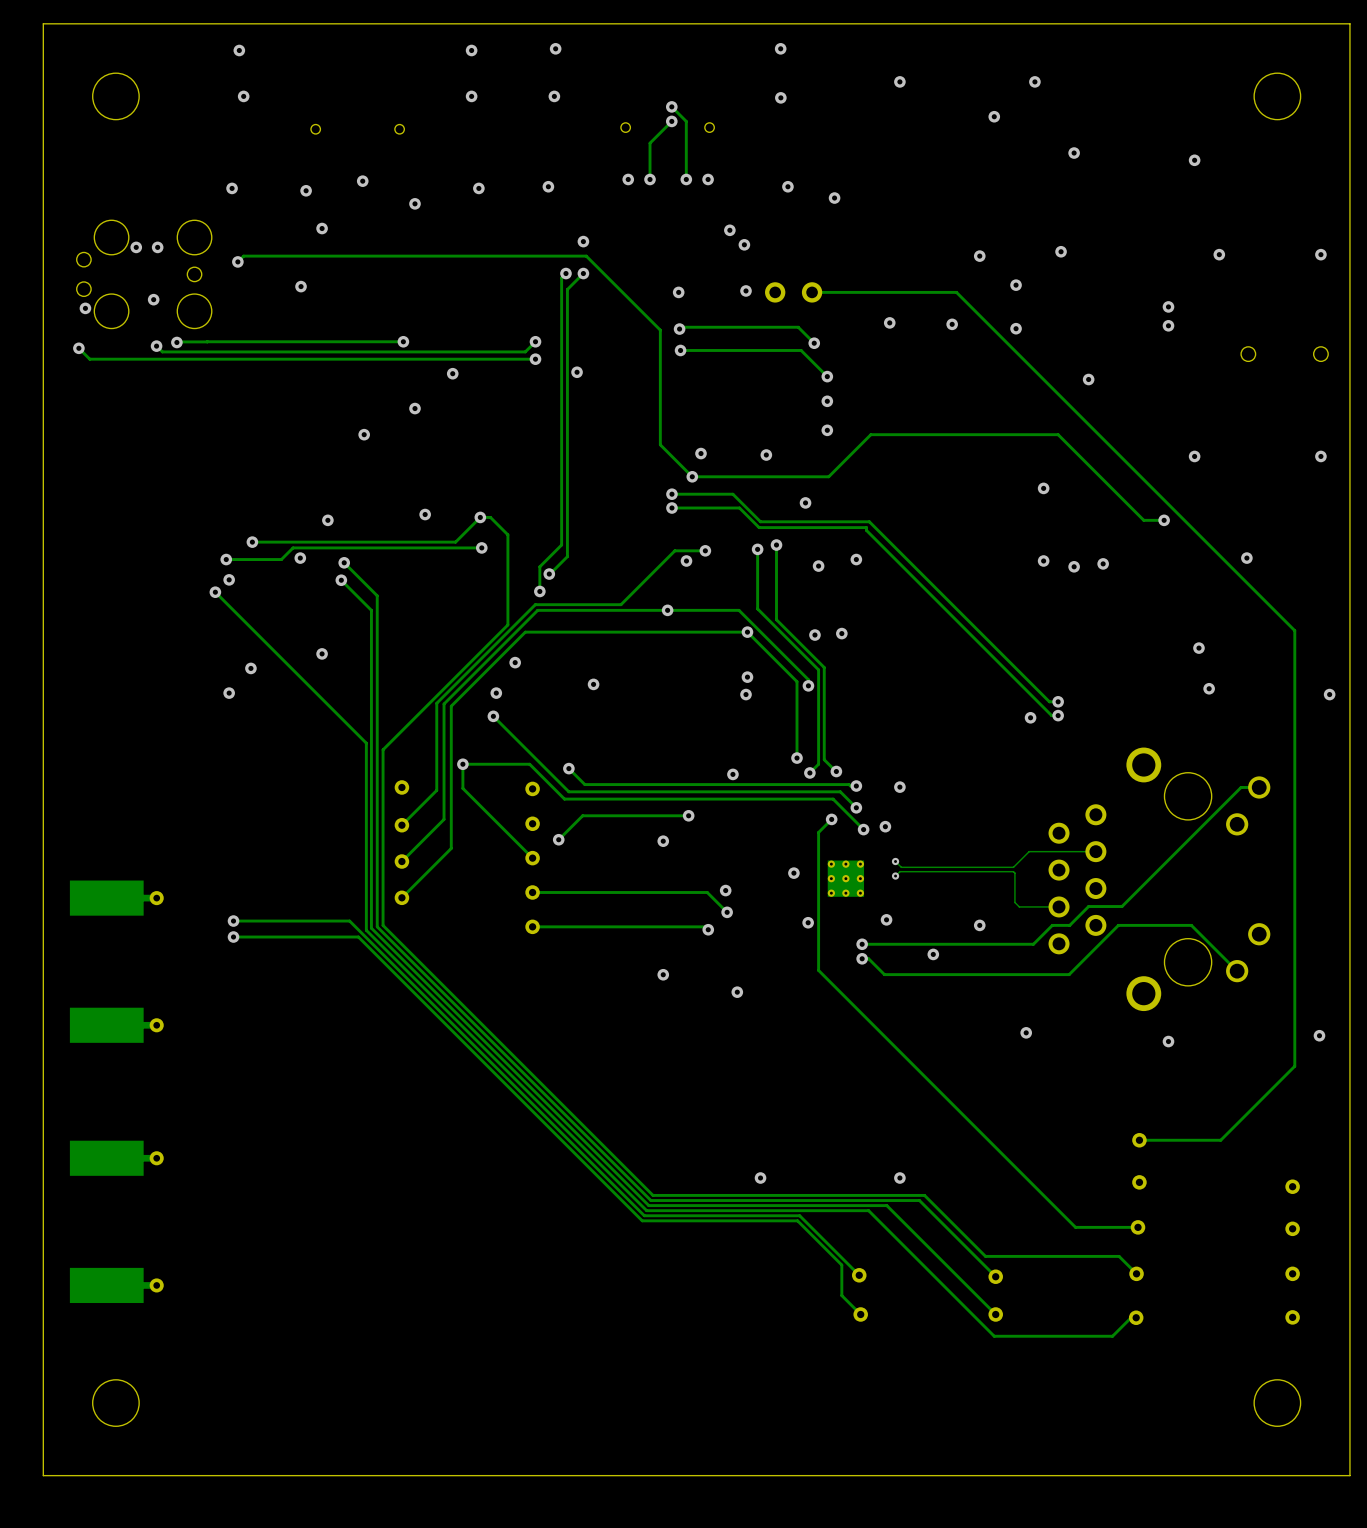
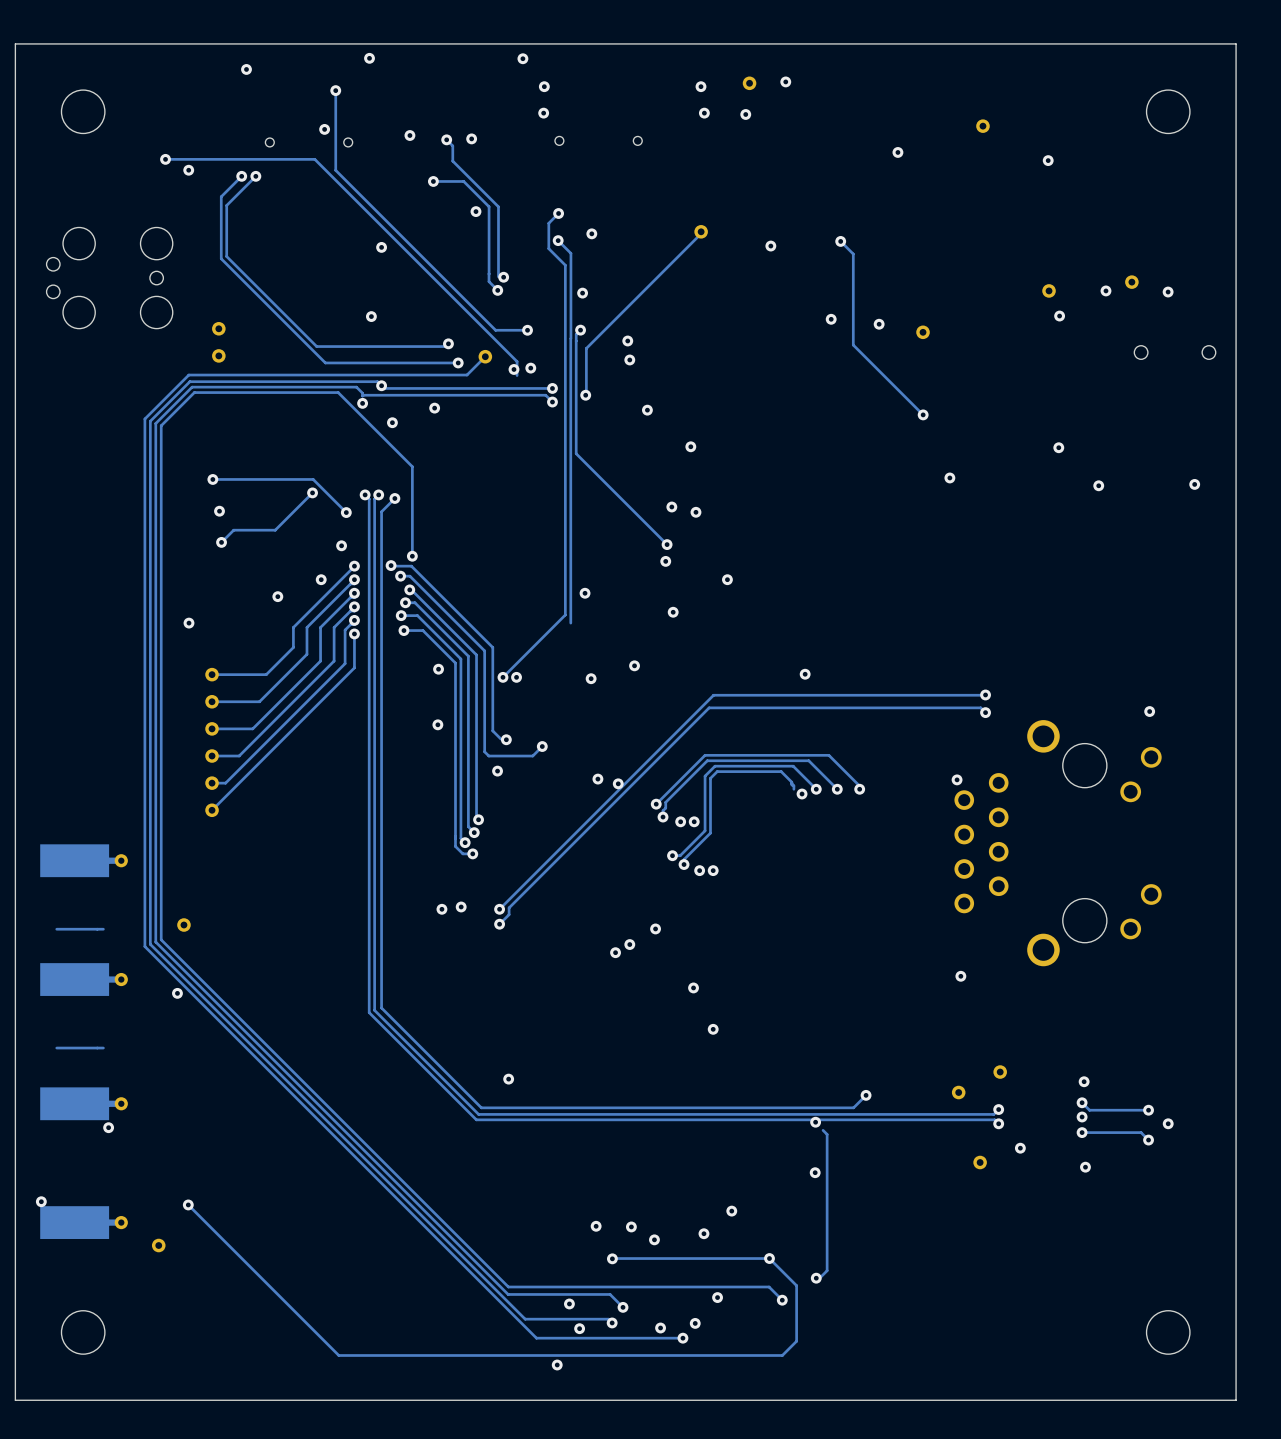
via: none -> (369, 58)
via: none -> (522, 58)
via: (555, 48) -> none
via position: (780, 48) -> (700, 86)
via: (239, 50) -> none
via: (471, 50) -> none
via: none -> (246, 69)
part: none -> (749, 83)
via: none -> (544, 86)
track: none -> (335, 90) (335, 170) (495, 330) (527, 330)
via: none -> (335, 90)
via position: (899, 81) -> (785, 81)
via: (1034, 81) -> none
via: (243, 96) -> none
via: (471, 96) -> none
via: (554, 96) -> none
via: none -> (543, 113)
via: none -> (745, 114)
track: (671, 106) (686, 121) (686, 179) -> none
via: (671, 106) -> none
part: none -> (982, 126)
via: none -> (324, 129)
via position: (994, 116) -> (897, 152)
via: none -> (409, 135)
track: (671, 121) (650, 143) (650, 179) -> none
via: (671, 121) -> none
via: none -> (471, 138)
track: none -> (446, 139) (452, 145) (452, 161) (498, 206) (498, 276)
via: none -> (446, 139)
track: none -> (165, 159) (314, 159) (517, 361) (517, 375)
via: none -> (165, 159)
via: none -> (1048, 160)
via: (1074, 153) -> none
via: none -> (188, 170)
via: (1194, 160) -> none
track: none -> (241, 176) (221, 196) (221, 258) (325, 362) (458, 362)
via: none -> (241, 176)
track: none -> (255, 176) (226, 205) (226, 256) (316, 346) (445, 346) (448, 343)
via: none -> (255, 176)
track: none -> (434, 179) (433, 178) (433, 181) (463, 181) (489, 206) (489, 281) (497, 290)
via: (628, 179) -> none
via: (650, 179) -> none
via: (686, 179) -> none
via: (708, 179) -> none
via: (362, 181) -> none
via position: (548, 186) -> (475, 211)
via: (787, 186) -> none
via: (232, 188) -> none
via position: (478, 188) -> (433, 181)
via: (306, 190) -> none
via: (834, 198) -> none
via: (414, 203) -> none
track: none -> (558, 213) (548, 223) (548, 248) (565, 265) (565, 614) (502, 677)
via: none -> (558, 213)
track: none -> (701, 231) (586, 348) (585, 395)
part: none -> (701, 231)
via: none -> (591, 233)
via: (322, 228) -> none
via: (729, 230) -> none
track: none -> (558, 240) (570, 253) (570, 338)
via: none -> (558, 240)
track: none -> (840, 241) (853, 254) (853, 345) (923, 414)
via: none -> (840, 241)
via: none -> (770, 246)
via: none -> (381, 247)
via: (583, 241) -> none
via: (744, 244) -> none
via: (136, 247) -> none
via: (157, 247) -> none
via: (1061, 251) -> none
via: (1219, 254) -> none
via: (1320, 254) -> none
via: (979, 256) -> none
track: (237, 261) (243, 256) (586, 256) (660, 330) (660, 444) (692, 476) (828, 476) (870, 434) (1058, 434) (1143, 520) (1164, 520) -> none
via: (237, 261) -> none
track: (565, 273) (561, 277) (561, 545) (539, 566) (539, 591) -> none
track: (583, 273) (567, 289) (567, 556) (549, 574) -> none
via: (583, 273) -> none
part: none -> (1131, 282)
via: (1016, 285) -> none
via: (301, 286) -> none
via: none -> (497, 290)
part: none -> (1049, 290)
via: none -> (1105, 290)
via: none -> (1168, 292)
via: none -> (582, 293)
via: (746, 290) -> none
via: (678, 292) -> none
part: (793, 292) -> none
track: (812, 292) (956, 292) (1294, 630) (1294, 1066) (1220, 1140) (1139, 1140) -> none
via: (153, 299) -> none
via: (1168, 306) -> none
via: (85, 308) -> none
via: none -> (371, 316)
via: none -> (1059, 316)
via: none -> (831, 319)
via: (889, 322) -> none
via position: (952, 324) -> (879, 324)
via: (1168, 325) -> none
part: none -> (218, 328)
via: (1016, 328) -> none
track: (679, 329) (681, 327) (798, 327) (814, 343) -> none
via: (679, 329) -> none
via: none -> (527, 330)
track: none -> (580, 330) (576, 334) (576, 453) (667, 544)
via: none -> (580, 330)
part: none -> (923, 332)
track: none -> (570, 338) (570, 623)
track: (207, 341) (176, 342) -> none
track: (403, 341) (207, 341) -> none
via: (403, 341) -> none
track: (535, 341) (525, 351) (162, 351) (156, 346) -> none
via: (535, 341) -> none
via: none -> (627, 340)
via: (176, 342) -> none
via: (814, 343) -> none
via: none -> (448, 343)
via: (156, 346) -> none
track: (78, 348) (89, 359) (535, 359) -> none
via: (78, 348) -> none
track: (680, 350) (801, 350) (827, 376) -> none
via: (680, 350) -> none
part: none -> (218, 355)
track: none -> (485, 356) (467, 375) (188, 375) (144, 418) (144, 946) (536, 1338) (682, 1338)
part: none -> (485, 356)
via: (535, 359) -> none
via: none -> (629, 359)
via: none -> (458, 362)
via: none -> (530, 368)
via position: (452, 373) -> (381, 385)
via: (827, 376) -> none
via: (1088, 379) -> none
track: none -> (552, 388) (384, 388) (377, 381) (189, 381) (150, 421) (150, 944) (525, 1319) (608, 1319) (612, 1322)
via: none -> (552, 388)
via: none -> (585, 395)
via: (827, 401) -> none
track: none -> (552, 402) (545, 395) (362, 396) (362, 393) (356, 387) (192, 387) (155, 423) (155, 942) (508, 1294) (610, 1294) (623, 1307)
via: none -> (552, 402)
via: none -> (434, 408)
via: none -> (647, 410)
via: none -> (923, 414)
via: none -> (392, 422)
via: (827, 430) -> none
via: (364, 434) -> none
via: (701, 453) -> none
via: none -> (1058, 447)
via: (1194, 456) -> none
via position: (1320, 456) -> (1194, 484)
via: (692, 476) -> none
track: none -> (212, 479) (313, 479) (346, 512)
via: none -> (212, 479)
track: (671, 494) (732, 494) (760, 521) (869, 521) (1049, 701) (1058, 701) -> none
via: (671, 494) -> none
via: none -> (1098, 485)
via: (805, 502) -> none
track: none -> (312, 492) (275, 530) (233, 530) (221, 542)
via: none -> (312, 492)
track: none -> (365, 494) (369, 499) (369, 1012) (476, 1119) (994, 1119) (998, 1123)
via: none -> (365, 494)
track: none -> (378, 494) (374, 499) (374, 1010) (478, 1114) (993, 1114) (998, 1109)
via: none -> (378, 494)
track: (671, 508) (739, 508) (759, 527) (866, 527) (866, 530) (1051, 715) (1058, 715) (1061, 718) -> none
via: (671, 508) -> none
track: none -> (394, 498) (381, 511) (381, 1008) (481, 1107) (853, 1107) (866, 1095)
via: none -> (394, 498)
via: (425, 514) -> none
via: (480, 517) -> none
via: none -> (671, 507)
via: (327, 520) -> none
via: (1164, 520) -> none
via: none -> (219, 511)
via: none -> (346, 512)
via: none -> (695, 512)
track: (252, 542) (455, 542) (480, 517) (490, 517) (507, 534) (507, 624) (383, 749) (383, 925) (653, 1195) (924, 1195) (985, 1256) (1119, 1256) (1136, 1273) -> none
via: (252, 542) -> none
track: (776, 545) (776, 619) (824, 667) (824, 759) (836, 771) -> none
via: (776, 545) -> none
track: (481, 547) (293, 547) (281, 559) (226, 559) -> none
via: (481, 547) -> none
track: (757, 549) (757, 608) (818, 669) (818, 764) (809, 772) -> none
via: (757, 549) -> none
track: (705, 550) (674, 550) (621, 604) (535, 604) (436, 703) (436, 790) (401, 825) -> none
via: (705, 550) -> none
via: none -> (221, 542)
via: (300, 558) -> none
via: (1246, 558) -> none
via: (226, 559) -> none
via: none -> (667, 544)
via: (856, 559) -> none
via: none -> (341, 545)
via: (686, 560) -> none
via: (1043, 560) -> none
track: (344, 562) (377, 595) (377, 926) (650, 1200) (919, 1200) (995, 1276) -> none
via: (344, 562) -> none
via: (1103, 563) -> none
via: (818, 566) -> none
via: (1074, 566) -> none
track: none -> (412, 556) (412, 466) (338, 392) (194, 392) (161, 425) (161, 939) (508, 1287) (769, 1287) (782, 1300)
via: none -> (412, 556)
via: (549, 574) -> none
via: none -> (665, 561)
via: (229, 579) -> none
track: (341, 580) (371, 610) (371, 928) (648, 1205) (886, 1205) (995, 1314) -> none
via: (341, 580) -> none
track: none -> (354, 566) (293, 627) (293, 647) (266, 674) (212, 674)
via: none -> (354, 566)
track: none -> (391, 565) (411, 566) (492, 647) (492, 730) (500, 739)
via: none -> (391, 565)
via: (539, 591) -> none
track: (215, 592) (366, 743) (366, 930) (646, 1210) (868, 1210) (994, 1336) (1112, 1336) (1131, 1317) (1136, 1317) -> none
via: (215, 592) -> none
track: none -> (400, 576) (409, 576) (484, 650) (484, 751) (488, 756) (532, 756) (542, 746)
via: none -> (400, 576)
via: none -> (321, 579)
track: none -> (354, 579) (354, 583) (350, 583) (306, 627) (306, 654) (259, 701) (212, 701)
via: none -> (354, 579)
via: none -> (727, 579)
track: none -> (409, 589) (476, 654) (476, 817) (478, 819)
via: none -> (409, 589)
via position: (667, 610) -> (585, 593)
track: none -> (354, 593) (354, 597) (350, 597) (320, 627) (320, 661) (252, 728) (212, 728)
via: none -> (354, 593)
via: none -> (277, 596)
track: none -> (405, 602) (414, 602) (468, 656) (468, 826) (474, 832)
via: none -> (405, 602)
track: none -> (354, 606) (354, 611) (350, 611) (334, 627) (334, 661) (239, 756) (212, 756)
via: none -> (354, 606)
via: (841, 633) -> none
track: none -> (401, 615) (417, 615) (460, 659) (460, 838) (465, 842)
via: none -> (401, 615)
via: (814, 635) -> none
track: none -> (354, 620) (354, 624) (350, 624) (345, 630) (345, 663) (225, 783) (212, 783)
via: none -> (354, 620)
via: none -> (188, 623)
via: (1198, 648) -> none
track: none -> (403, 630) (422, 630) (455, 663) (455, 846) (462, 853) (472, 853)
via: none -> (403, 630)
via: (322, 653) -> none
track: none -> (354, 633) (354, 667) (212, 810)
via: none -> (354, 633)
via: (515, 662) -> none
via: (250, 668) -> none
via: (747, 677) -> none
via: (593, 684) -> none
track: (808, 685) (808, 679) (739, 610) (537, 610) (444, 704) (444, 819) (401, 861) -> none
via: (808, 685) -> none
via: (1209, 688) -> none
via: none -> (634, 665)
via: (229, 693) -> none
via: (746, 694) -> none
via: (1329, 694) -> none
part: none -> (212, 674)
via: none -> (805, 674)
via: none -> (502, 677)
via: none -> (516, 677)
via: (1058, 701) -> none
via: none -> (591, 678)
via: (1058, 715) -> none
track: (493, 716) (568, 791) (840, 791) (856, 807) -> none
via: (493, 716) -> none
via: (1030, 717) -> none
track: none -> (985, 695) (713, 695) (499, 909)
via: none -> (985, 694)
part: none -> (212, 701)
via: none -> (1149, 711)
track: none -> (985, 712) (980, 707) (709, 707) (509, 907) (509, 914) (499, 924)
via: none -> (985, 712)
via: none -> (437, 724)
part: none -> (212, 728)
track: (797, 758) (797, 681) (747, 632) (525, 632) (451, 706) (451, 848) (401, 897) -> none
via: (797, 758) -> none
via: (462, 764) -> none
track: (568, 768) (584, 784) (856, 786) -> none
via: (836, 771) -> none
via: (809, 772) -> none
via: (732, 774) -> none
via: none -> (542, 746)
part: none -> (212, 756)
via: (856, 786) -> none
part: (401, 787) -> none
via: (899, 787) -> none
track: (1259, 787) (1241, 787) (1122, 906) (1088, 906) (1069, 925) (1052, 925) (1033, 944) (862, 944) -> none
part: (532, 788) -> none
via: none -> (497, 771)
via: (856, 807) -> none
via: none -> (957, 779)
part: none -> (212, 783)
track: (688, 815) (582, 815) (558, 839) -> none
track: none -> (791, 783) (793, 789)
track: none -> (791, 785) (791, 782) (781, 771) (717, 771) (710, 778) (710, 833) (684, 859) (684, 864)
track: (831, 819) (818, 832) (818, 970) (1075, 1227) (1138, 1227) -> none
via: (831, 819) -> none
track: none -> (816, 789) (793, 766) (715, 766) (705, 776) (705, 830) (680, 855) (672, 855)
via: none -> (816, 789)
track: none -> (837, 789) (808, 760) (707, 760) (665, 802) (663, 817)
via: none -> (837, 789)
track: none -> (859, 789) (859, 786) (828, 755) (705, 755) (656, 804)
via: none -> (859, 789)
part: (532, 823) -> none
part: (401, 825) -> none
track: (863, 829) (833, 799) (564, 799) (529, 764) (462, 764) (462, 788) (532, 858) -> none
via: (863, 829) -> none
via: none -> (656, 804)
via: (558, 839) -> none
via position: (663, 841) -> (597, 779)
part: none -> (212, 810)
via: none -> (663, 817)
track: (1095, 851) (1029, 851) (1013, 867) (901, 867) (895, 861) -> none
via: none -> (478, 819)
via: none -> (680, 821)
via: none -> (694, 821)
part: (532, 858) -> none
part: (401, 861) -> none
via: (895, 861) -> none
via: none -> (474, 832)
via: (793, 873) -> none
track: (893, 876) (899, 871) (1013, 871) (1014, 902) (1019, 906) (1059, 906) -> none
via: (895, 876) -> none
via: none -> (465, 842)
part: (845, 878) -> none
via: none -> (472, 853)
via: (725, 890) -> none
track: (532, 892) (707, 892) (727, 912) -> none
part: (532, 892) -> none
via: none -> (672, 855)
part: (401, 897) -> none
via: none -> (684, 864)
via: none -> (699, 870)
via: none -> (713, 870)
via: (727, 912) -> none
via: (886, 919) -> none
track: (233, 921) (349, 921) (644, 1215) (799, 1215) (859, 1275) -> none
via: (233, 921) -> none
via: (808, 922) -> none
via: (979, 925) -> none
track: (532, 926) (705, 926) (708, 929) -> none
part: (532, 926) -> none
via: (708, 929) -> none
track: (233, 937) (358, 937) (642, 1220) (797, 1220) (841, 1265) (841, 1295) (860, 1314) -> none
via: (233, 937) -> none
via: (862, 944) -> none
via: none -> (461, 906)
via: none -> (441, 909)
via: none -> (499, 909)
via: (933, 954) -> none
track: (862, 958) (868, 958) (884, 974) (1069, 974) (1118, 925) (1191, 925) (1237, 971) -> none
via: (862, 958) -> none
part: none -> (183, 925)
via: none -> (499, 924)
track: none -> (103, 929) (56, 929)
via: none -> (655, 928)
via: (663, 974) -> none
via: none -> (629, 944)
via: (737, 992) -> none
via: none -> (615, 952)
via position: (1026, 1032) -> (960, 976)
via: none -> (693, 987)
via: (1319, 1035) -> none
via: none -> (177, 993)
via: (1168, 1041) -> none
via: none -> (713, 1029)
track: none -> (103, 1048) (56, 1048)
part: none -> (1000, 1072)
via: none -> (508, 1079)
via: none -> (1084, 1081)
part: (1139, 1140) -> none
part: none -> (958, 1092)
via: none -> (866, 1095)
track: none -> (1082, 1102) (1089, 1110) (1148, 1110)
via: none -> (1082, 1102)
via: none -> (998, 1109)
via: none -> (1148, 1110)
via: none -> (1082, 1117)
via: (760, 1178) -> none
via: none -> (998, 1123)
via: none -> (1168, 1123)
part: (1139, 1182) -> none
via: none -> (108, 1127)
track: none -> (823, 1130) (827, 1134) (827, 1270) (819, 1278) (816, 1278)
part: (1292, 1186) -> none
track: none -> (1082, 1132) (1141, 1132) (1148, 1140)
via: none -> (1082, 1132)
via: none -> (1148, 1140)
via: none -> (1020, 1148)
part: none -> (980, 1162)
via: none -> (1085, 1167)
part: (1138, 1227) -> none
part: (1292, 1228) -> none
via: none -> (815, 1172)
via: none -> (41, 1201)
track: none -> (188, 1204) (338, 1355) (782, 1355) (796, 1341) (796, 1285) (769, 1258) (612, 1258)
via: none -> (188, 1204)
via: none -> (731, 1211)
part: (1136, 1273) -> none
part: (1292, 1273) -> none
part: (859, 1275) -> none
part: (995, 1276) -> none
via: none -> (596, 1226)
via: none -> (631, 1226)
via: none -> (703, 1233)
via: none -> (654, 1239)
part: none -> (158, 1245)
part: (860, 1314) -> none
part: (995, 1314) -> none
part: (1136, 1317) -> none
part: (1292, 1317) -> none
via: none -> (769, 1258)
via: none -> (612, 1258)
via: none -> (816, 1278)
via: none -> (717, 1297)
via: none -> (782, 1300)
via: none -> (569, 1303)
via: none -> (623, 1307)
via: none -> (612, 1322)
via: none -> (695, 1323)
via: none -> (660, 1328)
via: none -> (579, 1328)
via: none -> (682, 1338)
via: none -> (557, 1365)

